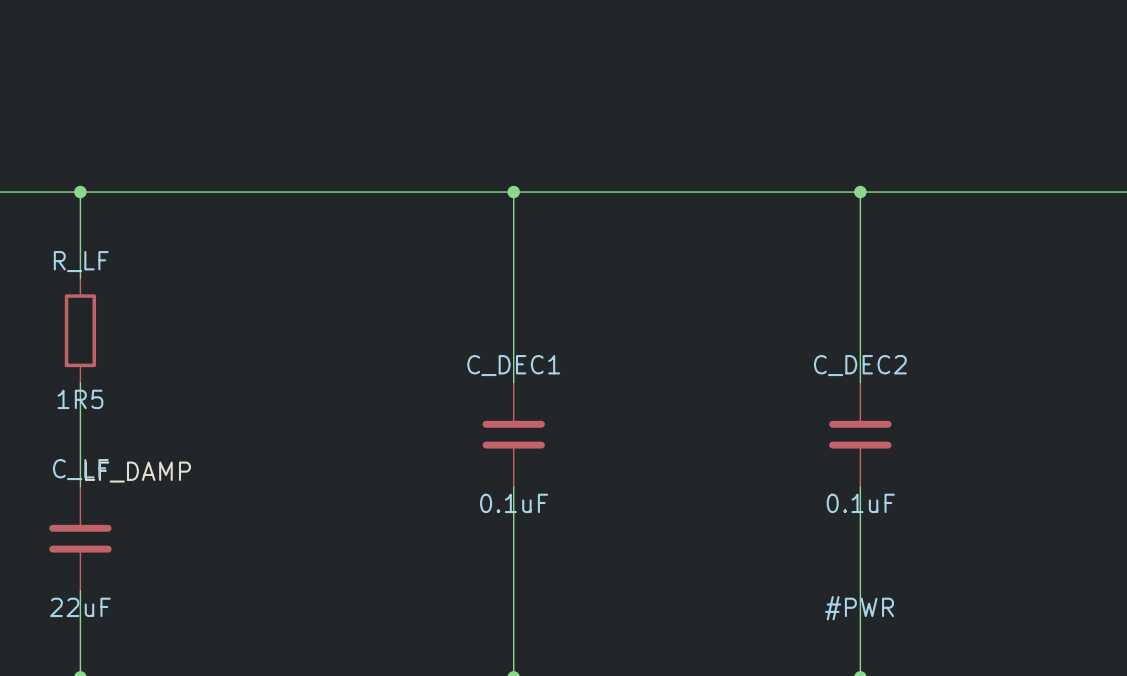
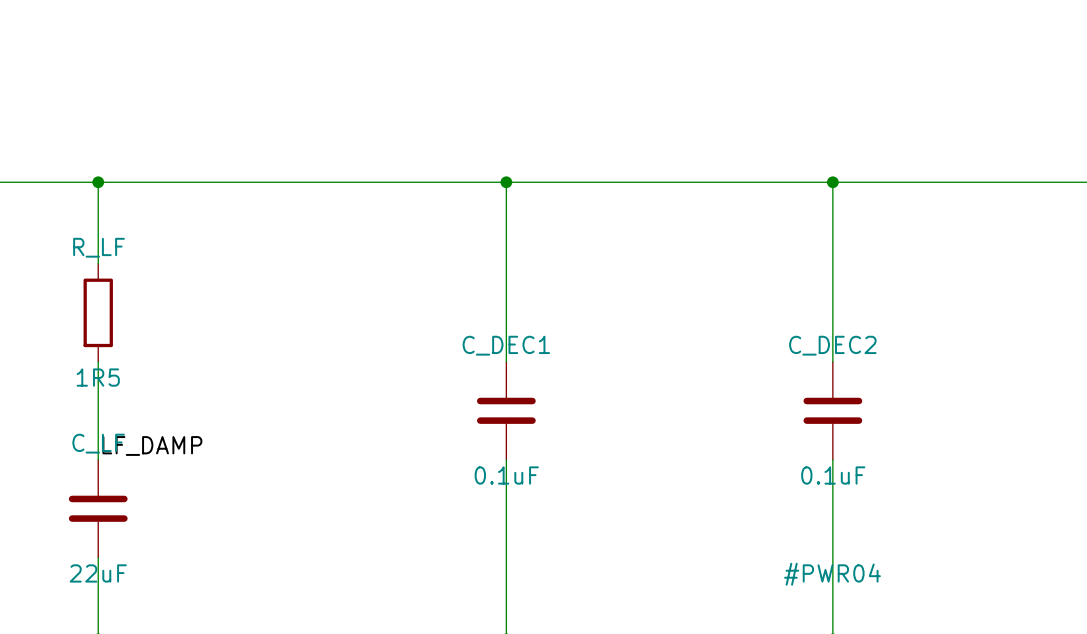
#PWR name: #PWR (859, 608) -> #PWR04 (832, 574)

